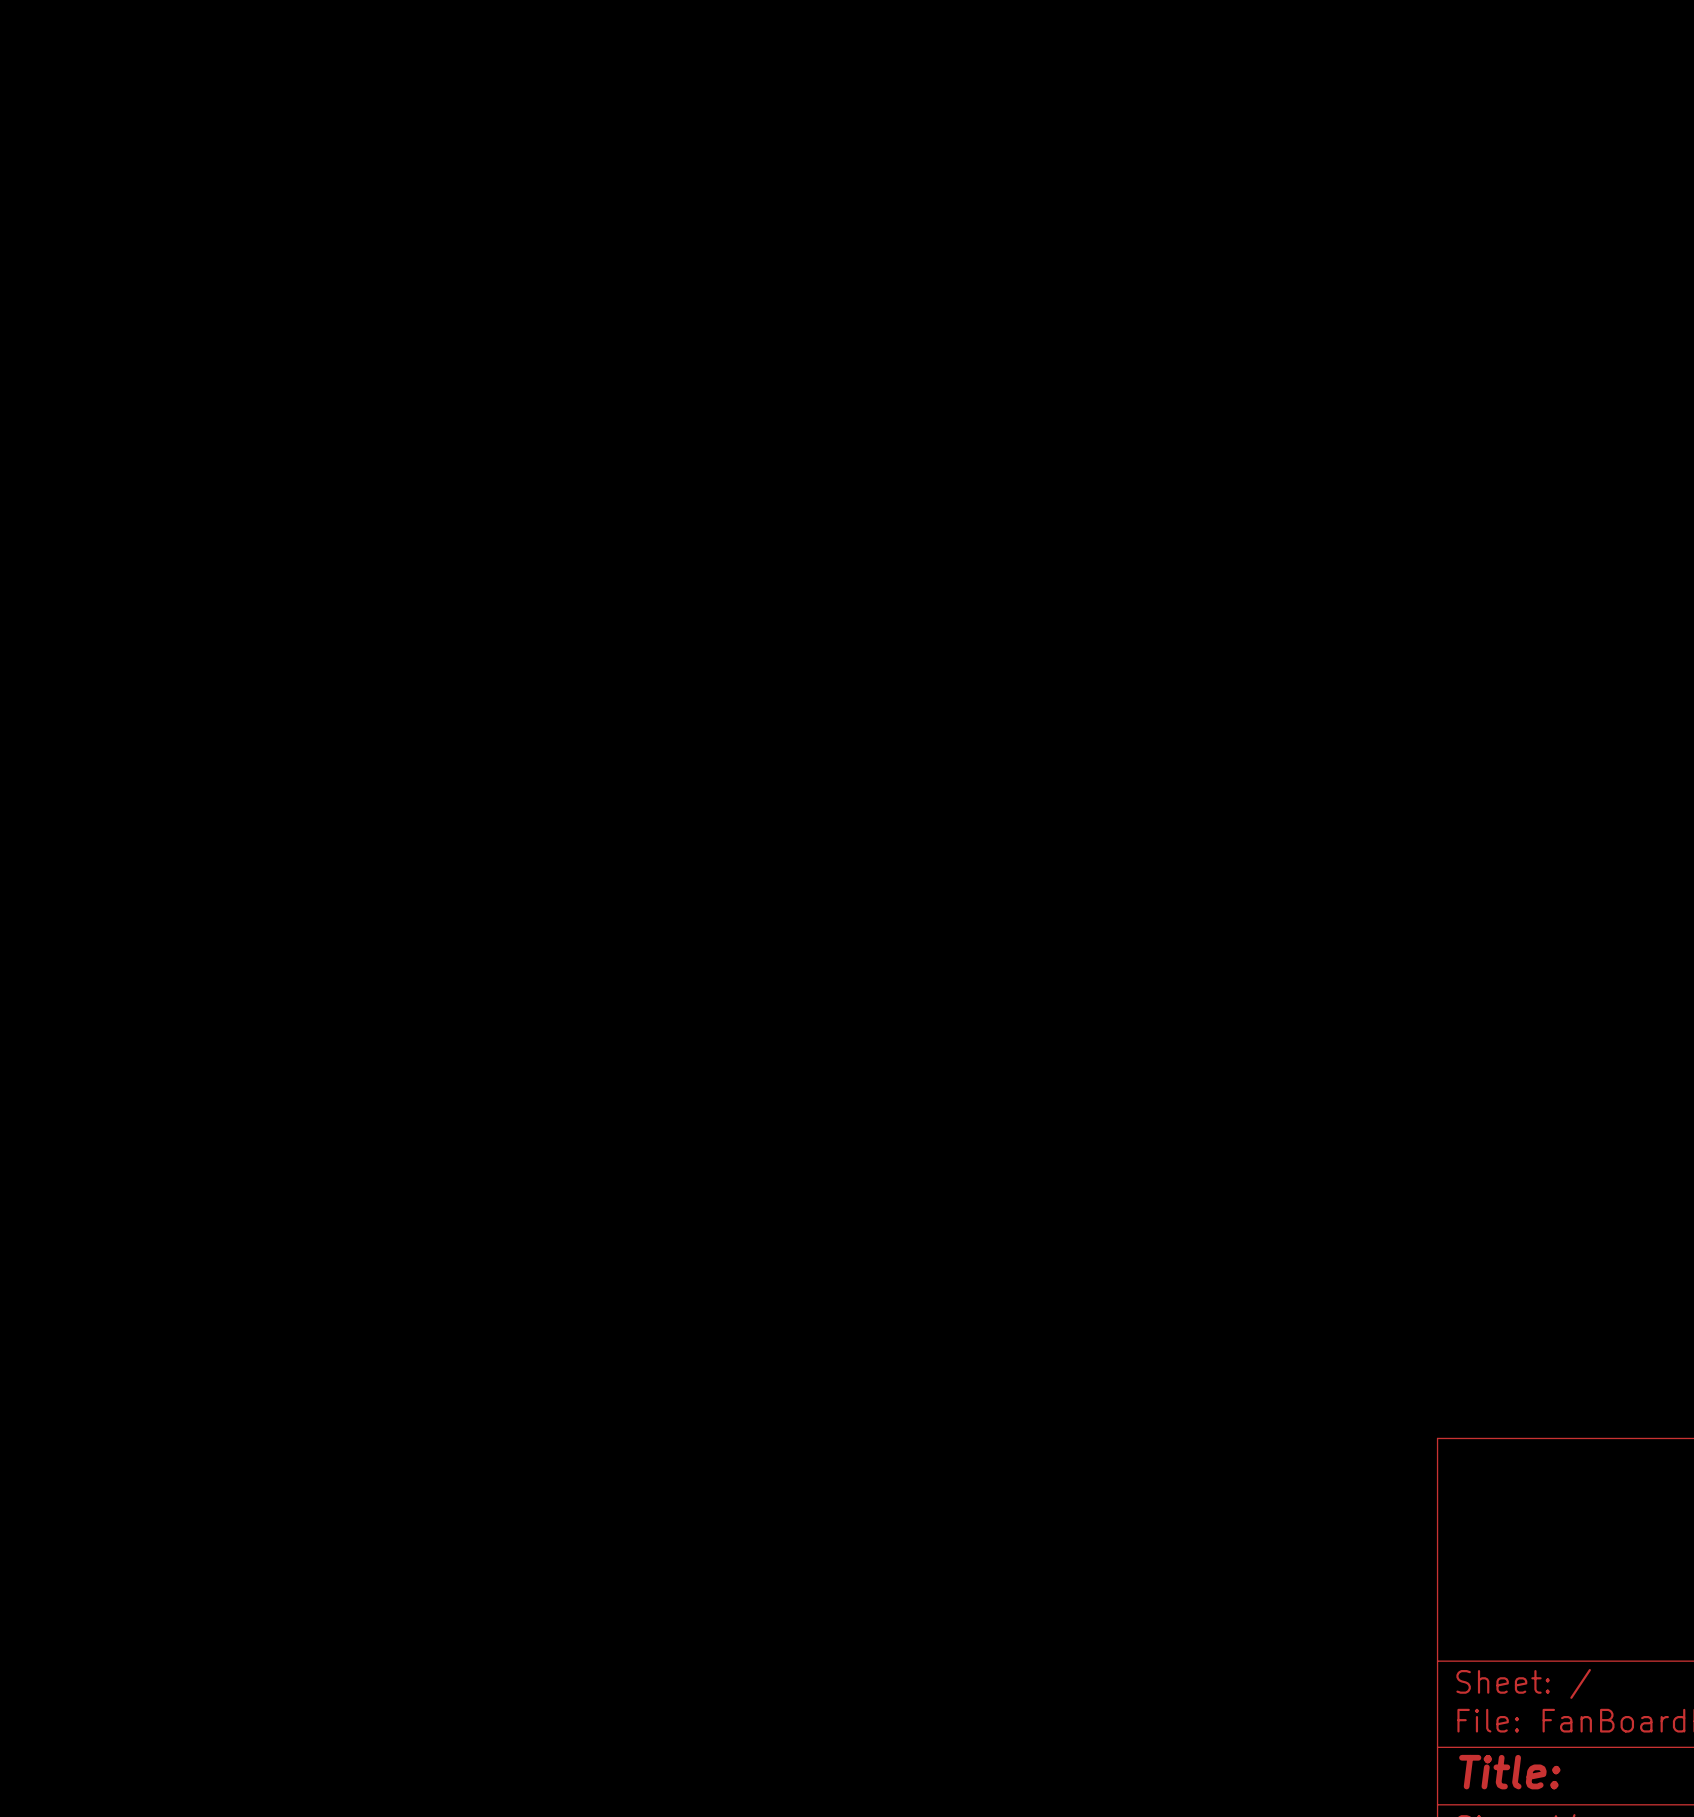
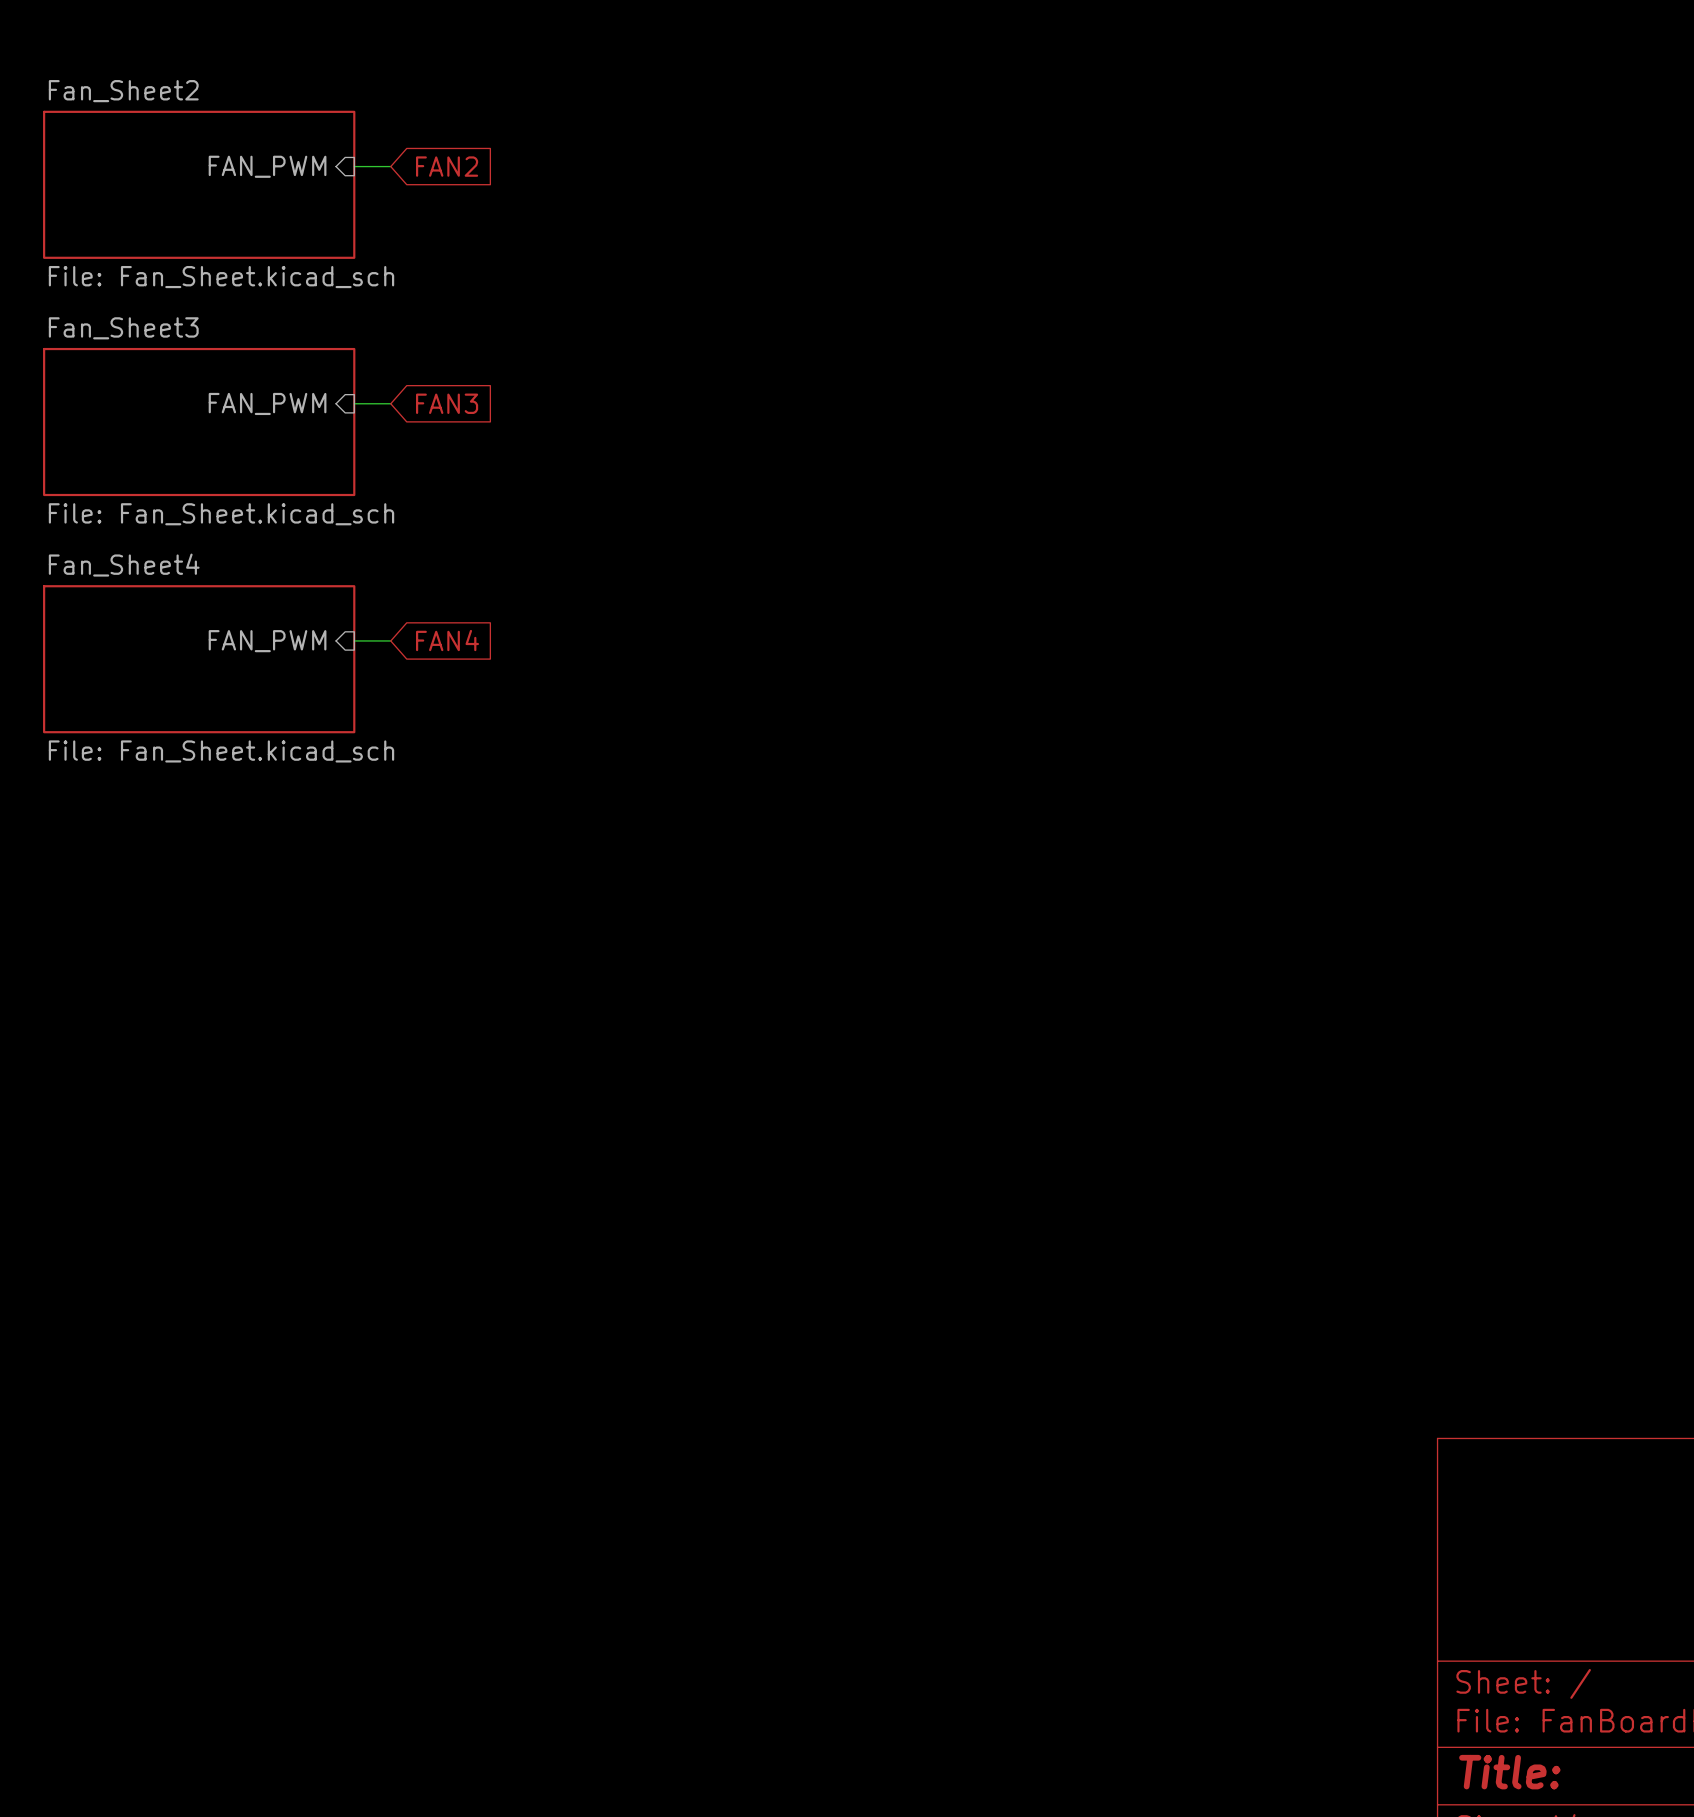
sheet pin: none -> FAN_PWM (267, 166)
wire: none -> (354, 166) (390, 166)
global label: none -> FAN2 (447, 166)
sheet Fan_Sheet2: none -> File: Fan_Sheet.kicad_sch (199, 184)
sheet pin: none -> FAN_PWM (267, 403)
wire: none -> (354, 403) (390, 403)
global label: none -> FAN3 (447, 403)
sheet Fan_Sheet3: none -> File: Fan_Sheet.kicad_sch (199, 422)
wire: none -> (354, 640) (390, 640)
global label: none -> FAN4 (447, 640)
sheet pin: none -> FAN_PWM (267, 641)
sheet Fan_Sheet4: none -> File: Fan_Sheet.kicad_sch (199, 659)

